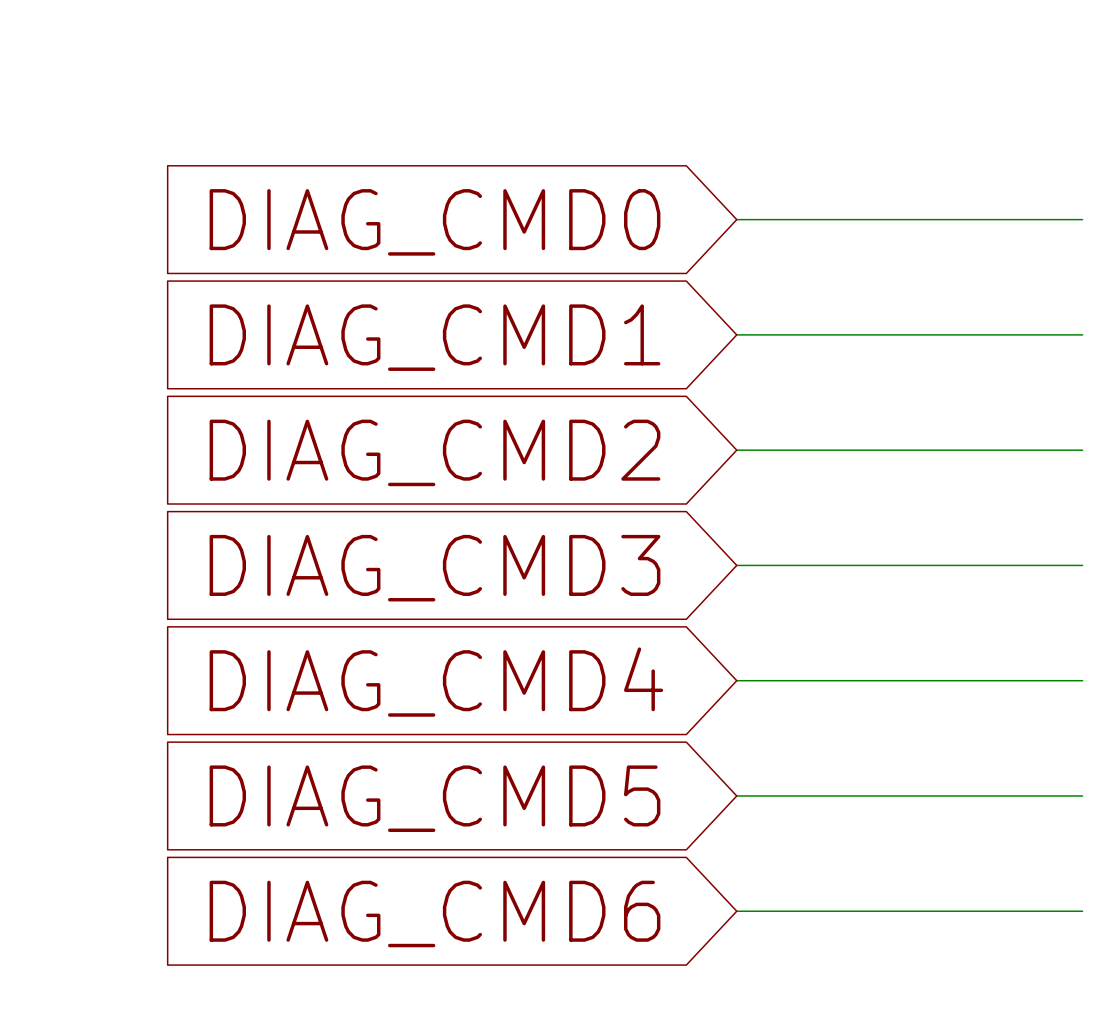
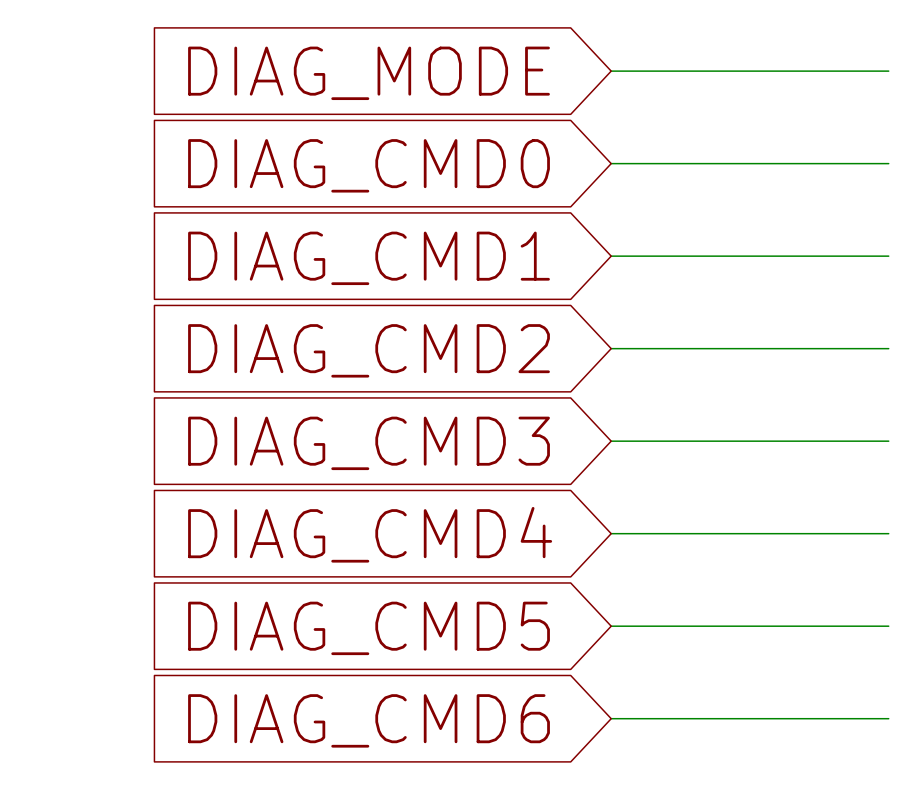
wire: none -> (611, 71) (888, 71)
global label: none -> DIAG_MODE (369, 73)

